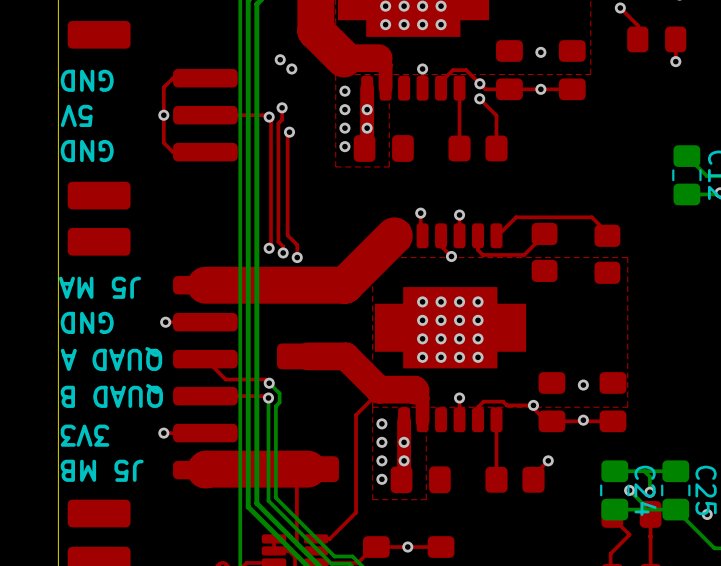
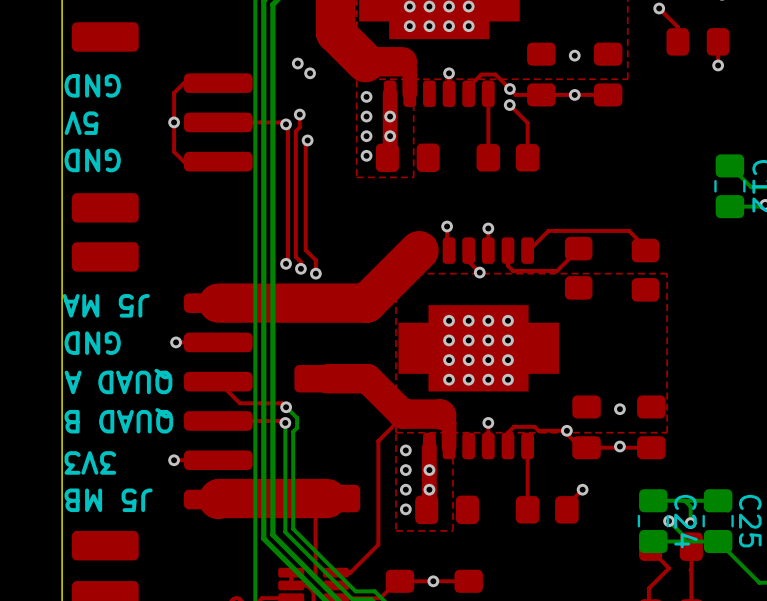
via: (707, 514) -> none

